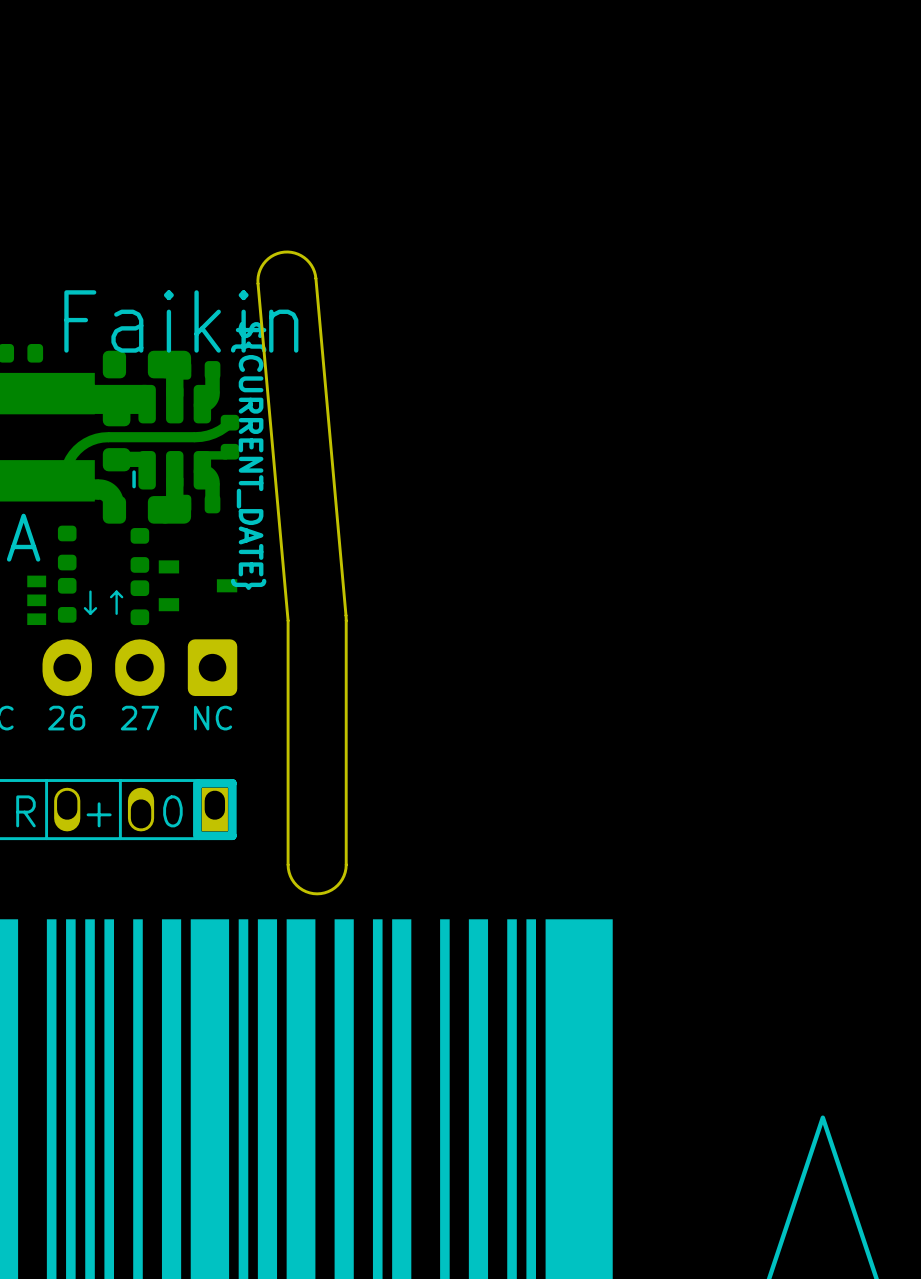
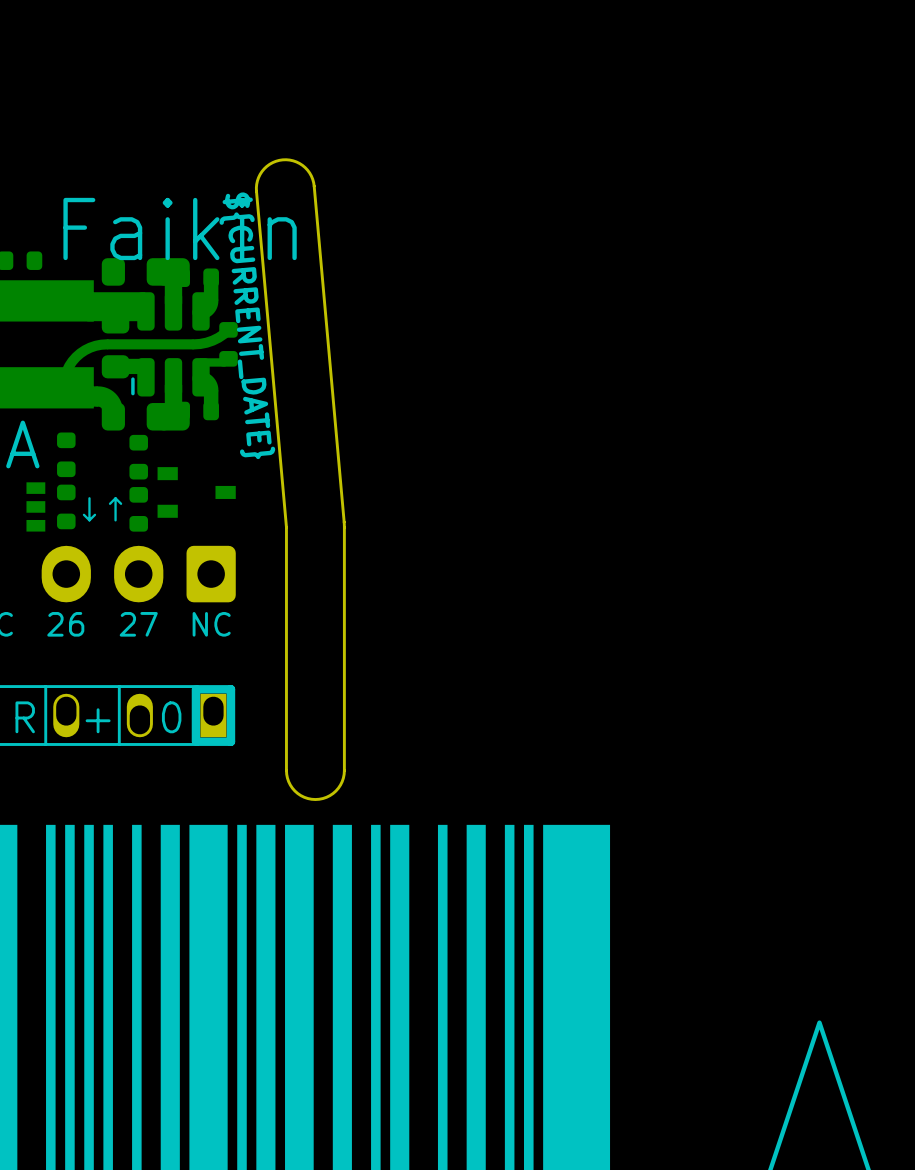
text rotation: 0° (248, 456) -> 5.1° counterclockwise (247, 325)

